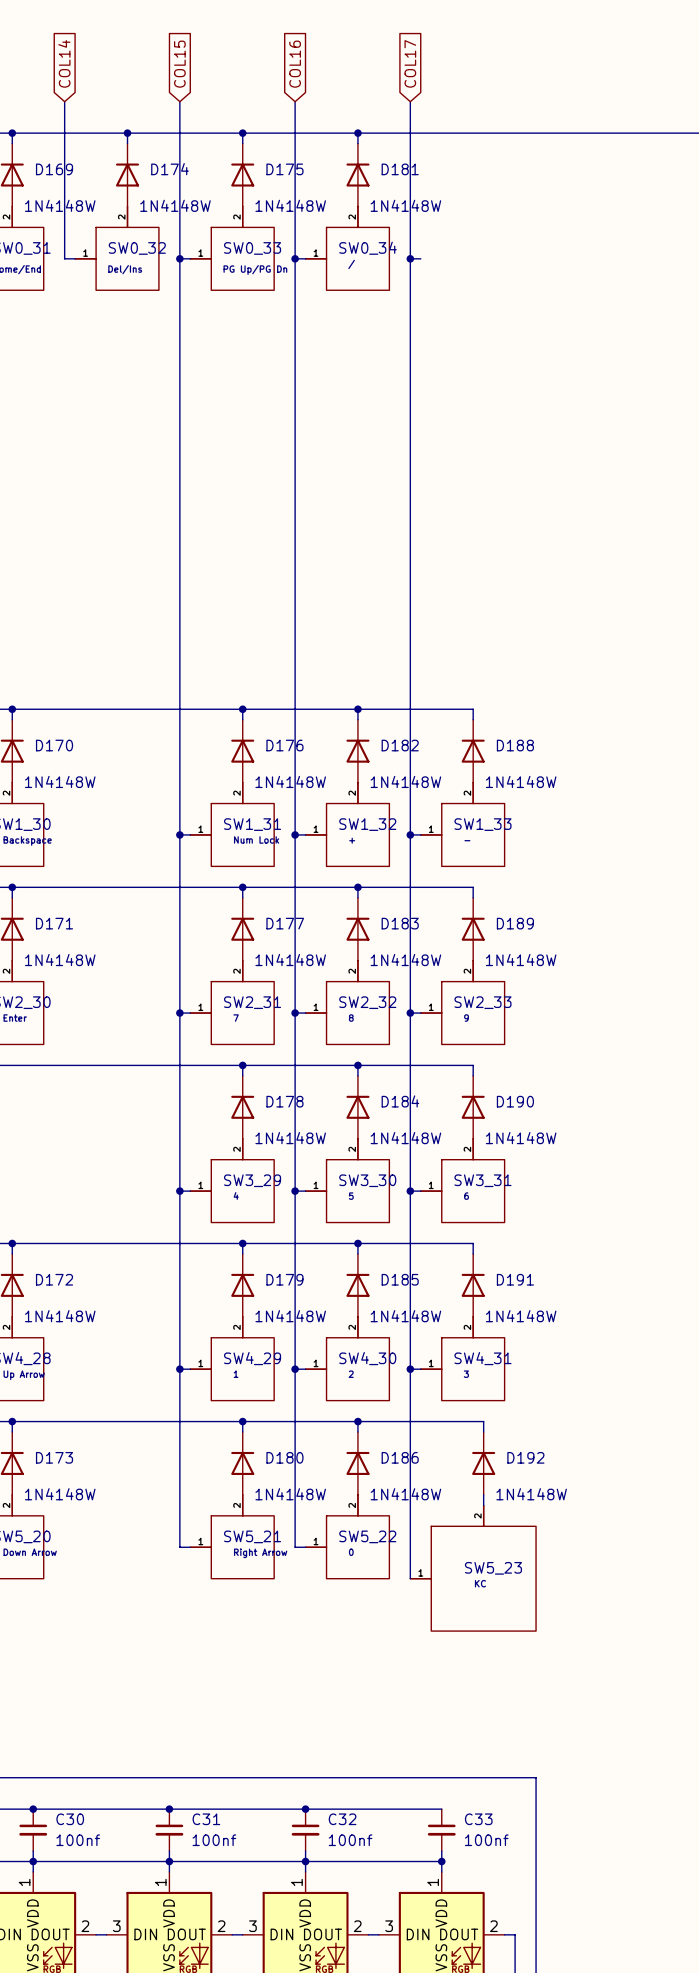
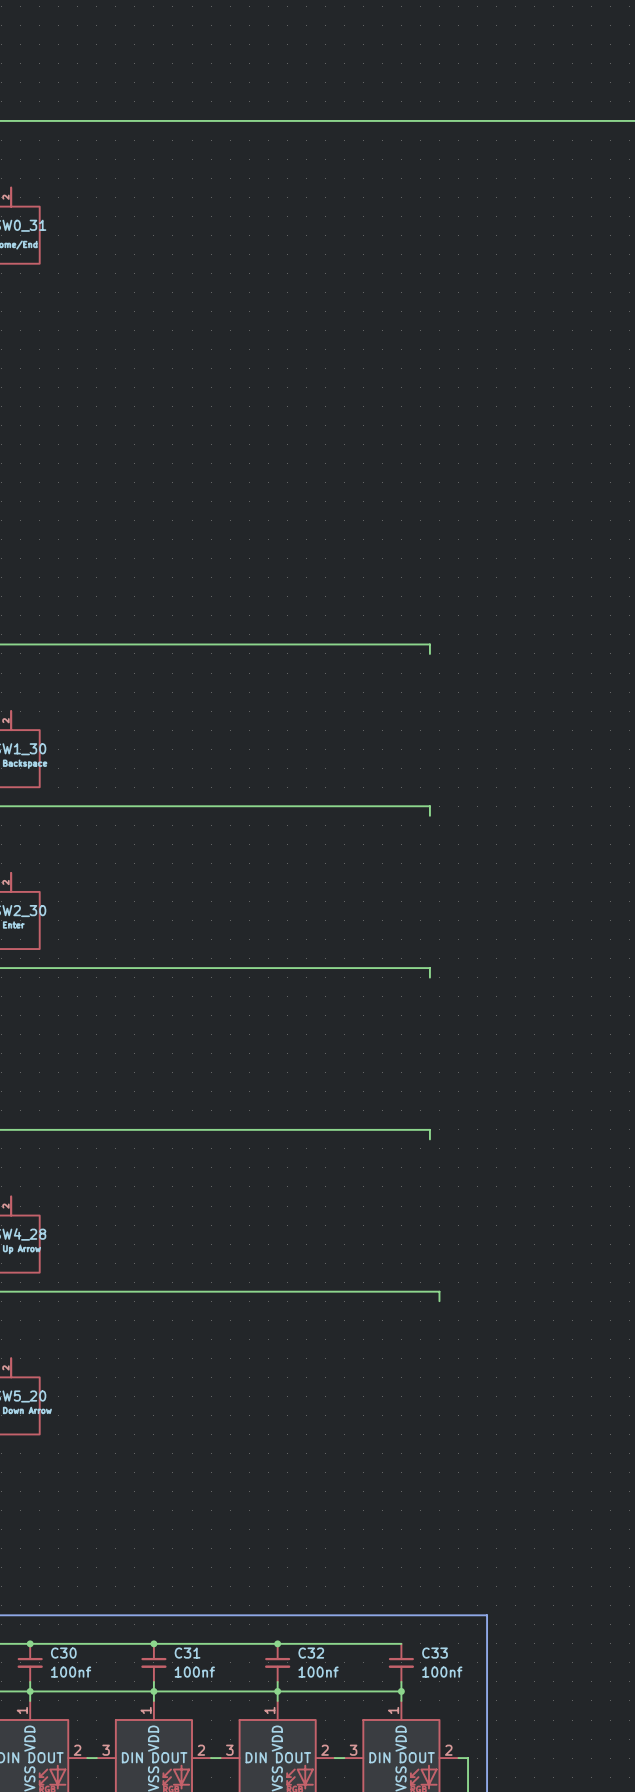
global label: COL14 (64, 63) -> none
global label: COL17 (410, 63) -> none
global label: COL15 (179, 64) -> none
global label: COL16 (295, 64) -> none
wire: (64, 101) (64, 258) (75, 258) -> none
wire: (179, 101) (179, 1547) (190, 1547) -> none
wire: (295, 101) (295, 1547) (305, 1547) -> none
wire: (410, 101) (410, 1578) -> none
wire: (12, 133) (12, 143) -> none
junction: (12, 133) -> none
wire: (127, 133) (127, 143) -> none
junction: (127, 133) -> none
wire: (242, 133) (242, 143) -> none
junction: (242, 133) -> none
wire: (357, 133) (357, 143) -> none
junction: (357, 133) -> none
D169: 1N4148W (12, 175) -> none
D174: 1N4148W (127, 175) -> none
D175: 1N4148W (242, 175) -> none
D181: 1N4148W (357, 175) -> none
SW0_32: (117, 248) -> none
SW0_33: (232, 248) -> none
SW0_34: (347, 248) -> none
wire: (179, 258) (190, 258) -> none
junction: (179, 258) -> none
wire: (295, 258) (305, 258) -> none
junction: (295, 258) -> none
wire: (410, 258) (420, 258) -> none
junction: (410, 258) -> none
wire: (12, 709) (12, 719) -> none
junction: (12, 709) -> none
wire: (242, 709) (242, 719) -> none
junction: (242, 709) -> none
wire: (357, 709) (357, 719) -> none
junction: (357, 709) -> none
D170: 1N4148W (12, 751) -> none
D176: 1N4148W (242, 751) -> none
D182: 1N4148W (357, 751) -> none
D188: 1N4148W (473, 751) -> none
SW1_31: (232, 824) -> none
SW1_32: (347, 824) -> none
SW1_33: (462, 824) -> none
wire: (179, 834) (190, 834) -> none
junction: (179, 834) -> none
wire: (295, 834) (305, 834) -> none
junction: (295, 834) -> none
wire: (410, 834) (420, 834) -> none
junction: (410, 834) -> none
wire: (12, 887) (12, 897) -> none
junction: (12, 887) -> none
wire: (242, 887) (242, 897) -> none
junction: (242, 887) -> none
wire: (357, 887) (357, 897) -> none
junction: (357, 887) -> none
D171: 1N4148W (12, 929) -> none
D177: 1N4148W (242, 929) -> none
D183: 1N4148W (357, 929) -> none
D189: 1N4148W (473, 929) -> none
SW2_31: (232, 1002) -> none
SW2_32: (347, 1002) -> none
SW2_33: (462, 1002) -> none
wire: (179, 1013) (190, 1013) -> none
junction: (179, 1013) -> none
wire: (295, 1013) (305, 1013) -> none
junction: (295, 1013) -> none
wire: (410, 1013) (420, 1013) -> none
junction: (410, 1013) -> none
wire: (242, 1065) (242, 1075) -> none
junction: (242, 1065) -> none
wire: (357, 1065) (357, 1075) -> none
junction: (357, 1065) -> none
D178: 1N4148W (242, 1107) -> none
D184: 1N4148W (357, 1107) -> none
D190: 1N4148W (473, 1107) -> none
SW3_29: (232, 1180) -> none
SW3_30: (347, 1180) -> none
SW3_31: (462, 1180) -> none
wire: (179, 1191) (190, 1191) -> none
junction: (179, 1191) -> none
wire: (295, 1191) (305, 1191) -> none
junction: (295, 1191) -> none
wire: (410, 1191) (420, 1191) -> none
junction: (410, 1191) -> none
wire: (12, 1243) (12, 1253) -> none
junction: (12, 1243) -> none
wire: (242, 1243) (242, 1253) -> none
junction: (242, 1243) -> none
wire: (357, 1243) (357, 1253) -> none
junction: (357, 1243) -> none
D172: 1N4148W (12, 1285) -> none
D179: 1N4148W (242, 1285) -> none
D185: 1N4148W (357, 1285) -> none
D191: 1N4148W (473, 1285) -> none
SW4_29: (232, 1358) -> none
SW4_30: (347, 1358) -> none
SW4_31: (462, 1358) -> none
wire: (179, 1369) (190, 1369) -> none
junction: (179, 1369) -> none
wire: (295, 1369) (305, 1369) -> none
junction: (295, 1369) -> none
wire: (410, 1369) (420, 1369) -> none
junction: (410, 1369) -> none
wire: (12, 1421) (12, 1432) -> none
junction: (12, 1421) -> none
wire: (242, 1421) (242, 1432) -> none
junction: (242, 1421) -> none
wire: (357, 1421) (357, 1432) -> none
junction: (357, 1421) -> none
D173: 1N4148W (12, 1463) -> none
D180: 1N4148W (242, 1463) -> none
D186: 1N4148W (357, 1463) -> none
D192: 1N4148W (483, 1463) -> none
wire: (483, 1494) (483, 1505) -> none
SW5_21: (232, 1536) -> none
SW5_22: (347, 1536) -> none
SW5_23: (473, 1568) -> none

